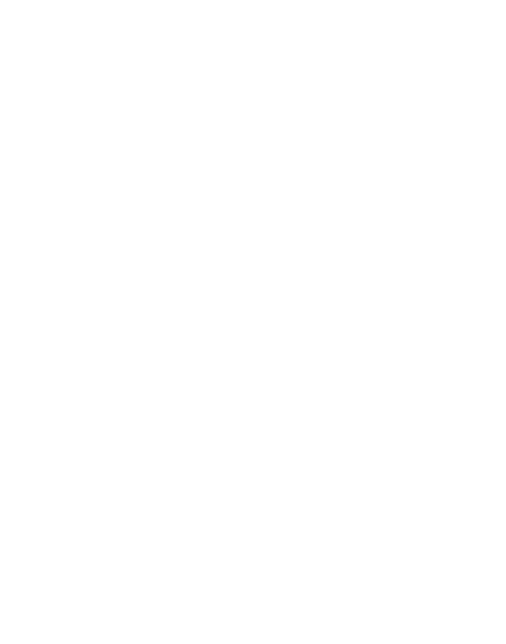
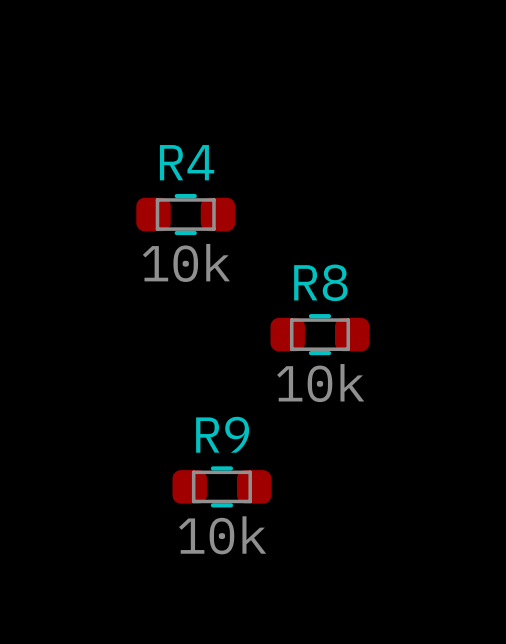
R4: none -> 10k (185, 214)
R8: none -> 10k (319, 334)
R9: none -> 10k (221, 486)

